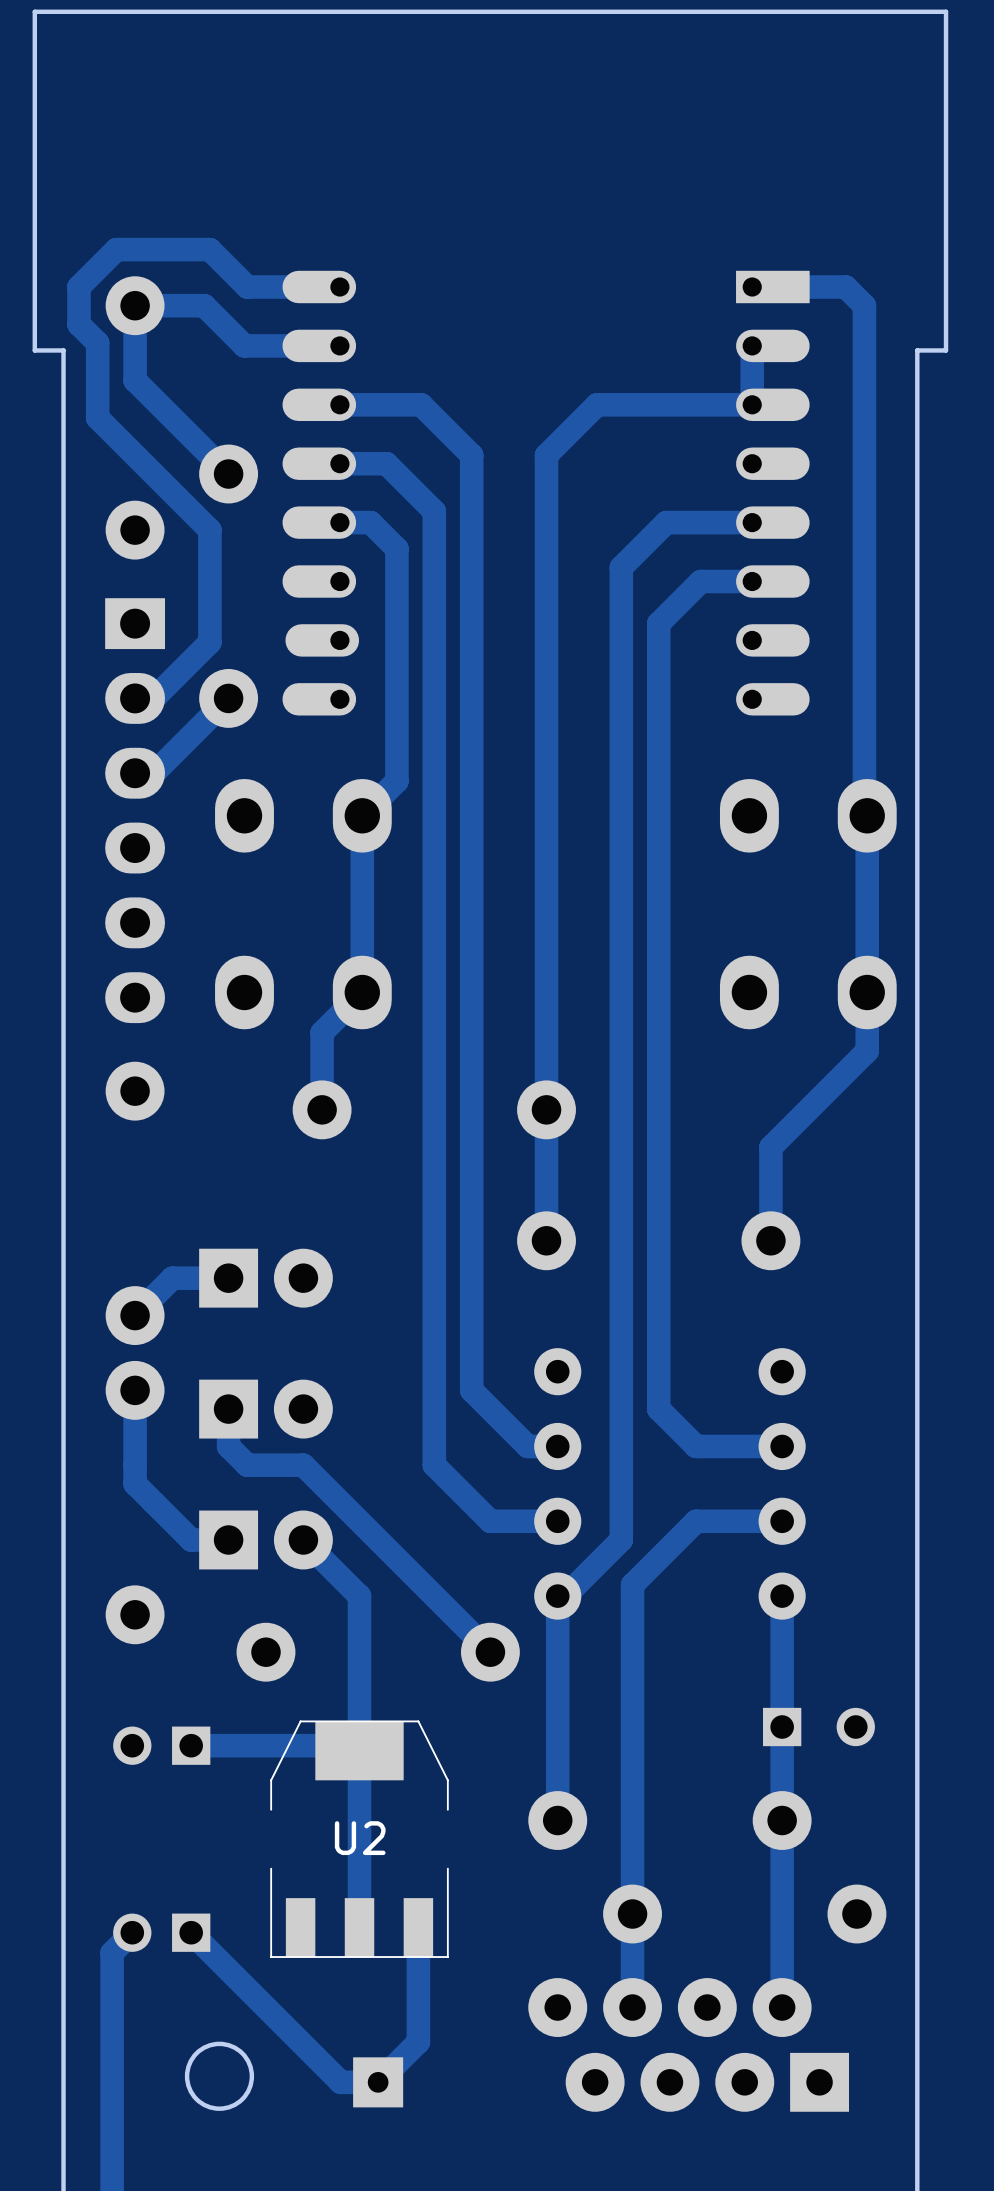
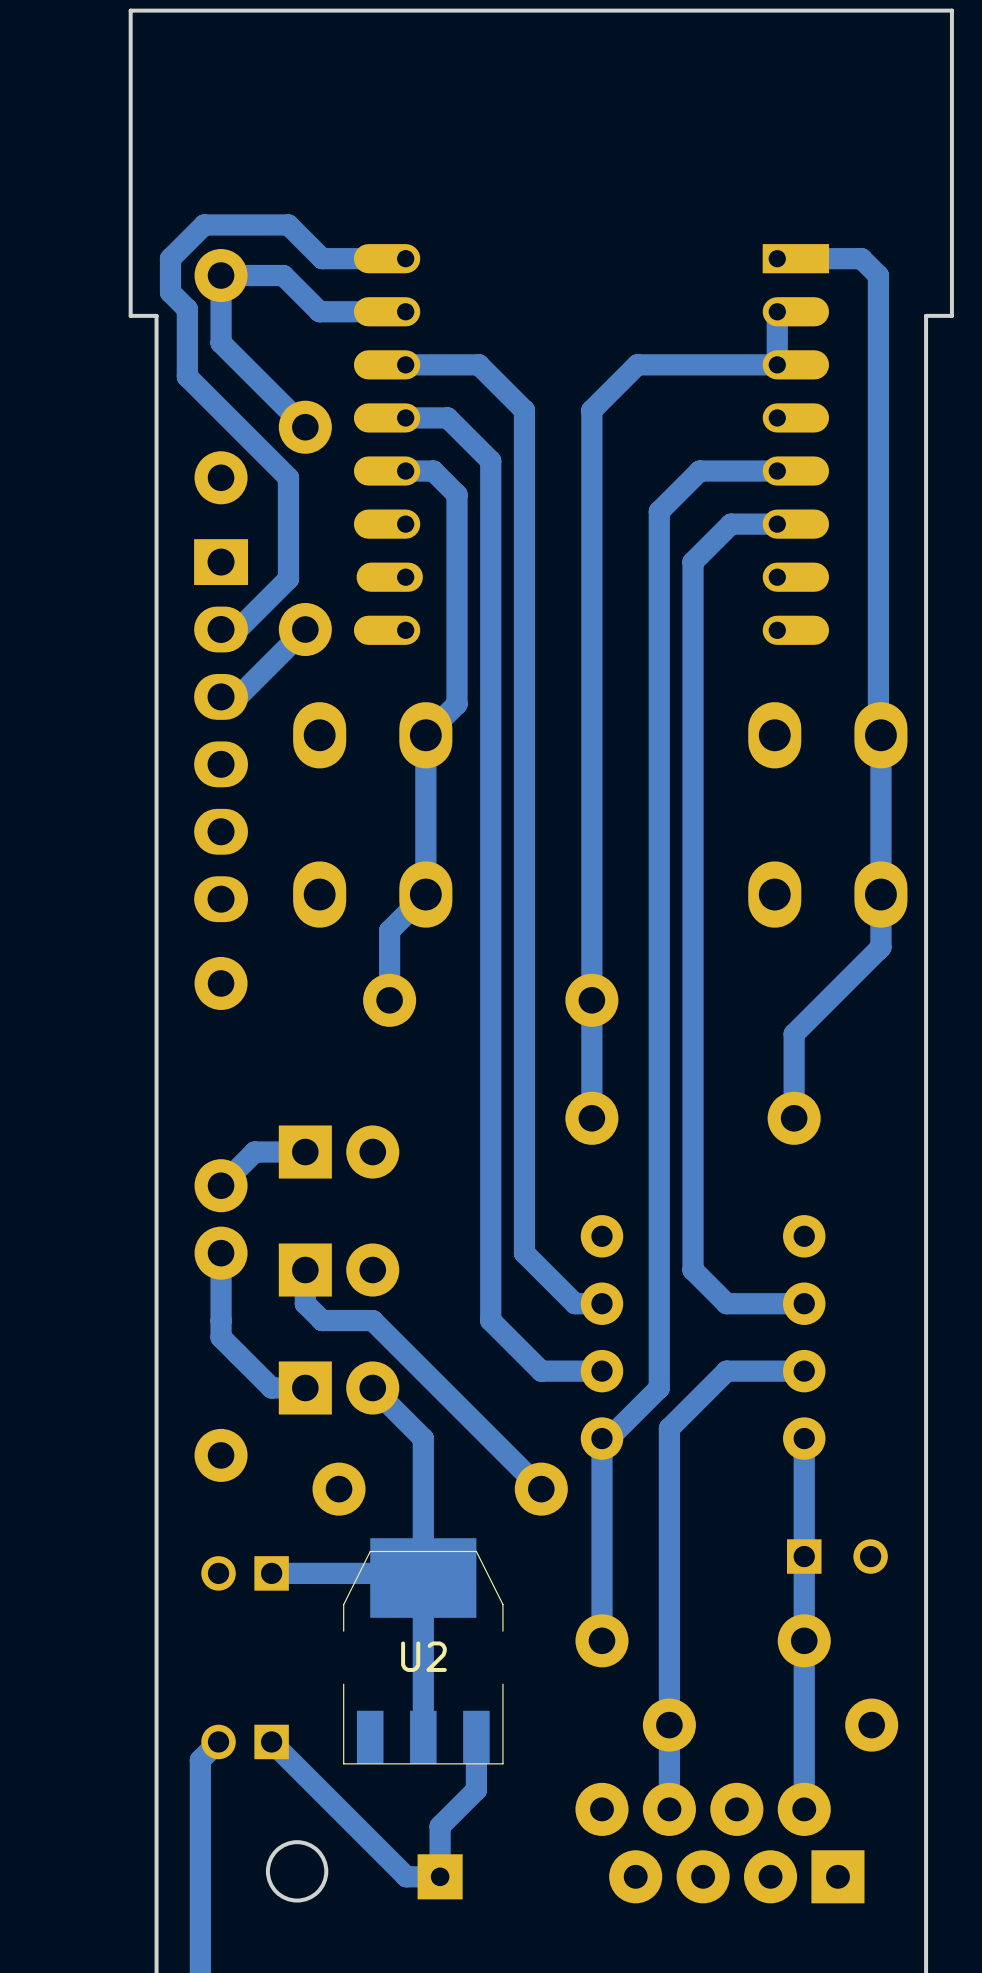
U2 footprint: [271, 1721, 448, 1958] -> [343, 1538, 503, 1764]
track: (418, 1986) (418, 2042) (378, 2082) -> (476, 1790) (440, 1826) (440, 1876)

